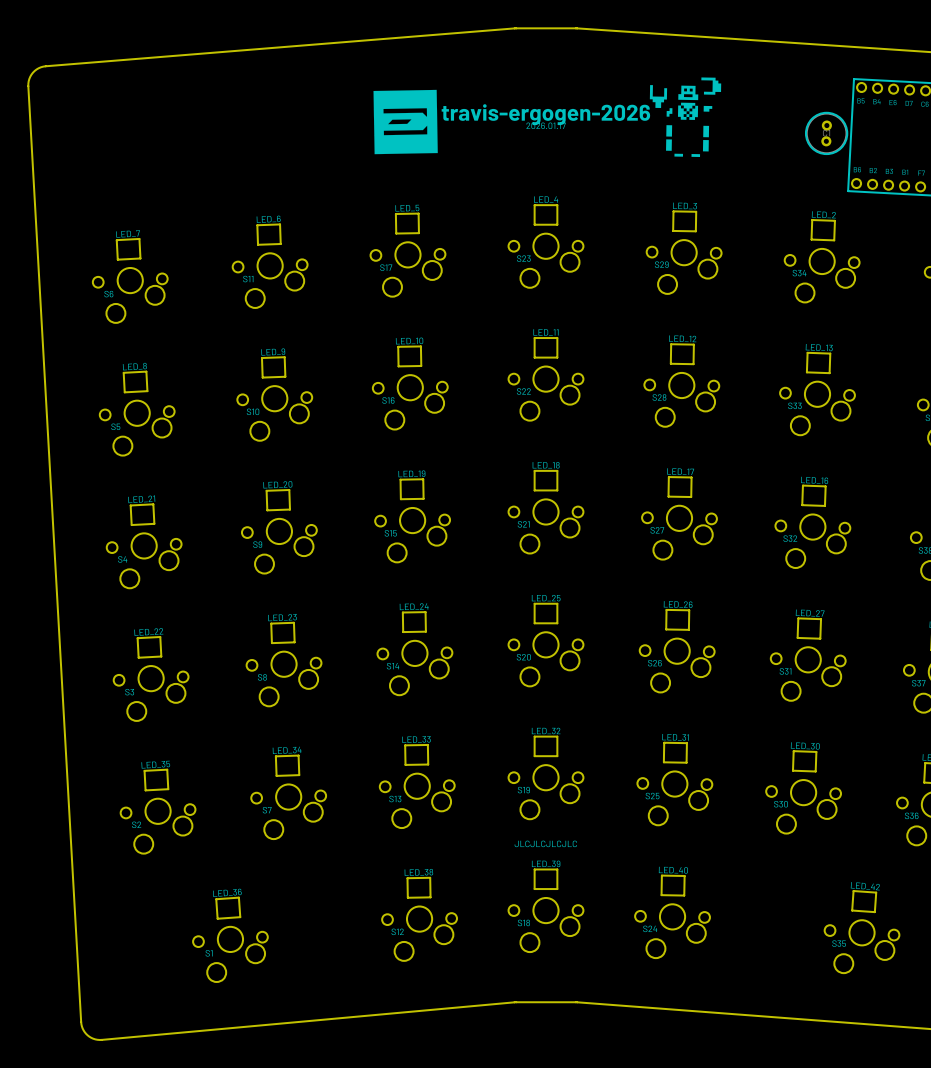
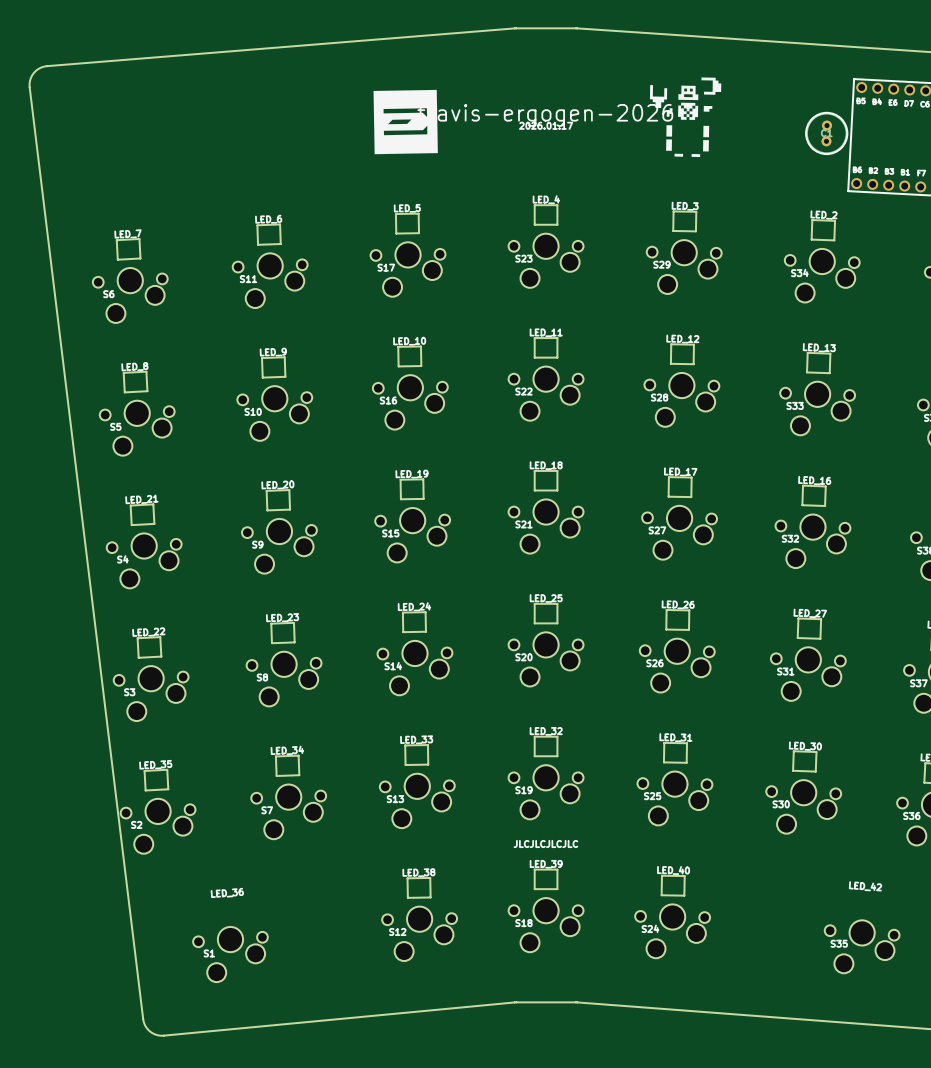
board edge: (46, 66) (38, 68) (32, 72) (28, 86) (81, 1022) (83, 1030) (91, 1037) (101, 1039) (516, 1002) -> (46, 66) (33, 73) (29, 87) (145, 1026) (154, 1034) (163, 1035) (516, 1002)
part: (864, 901) -> none
part: (228, 908) -> none

